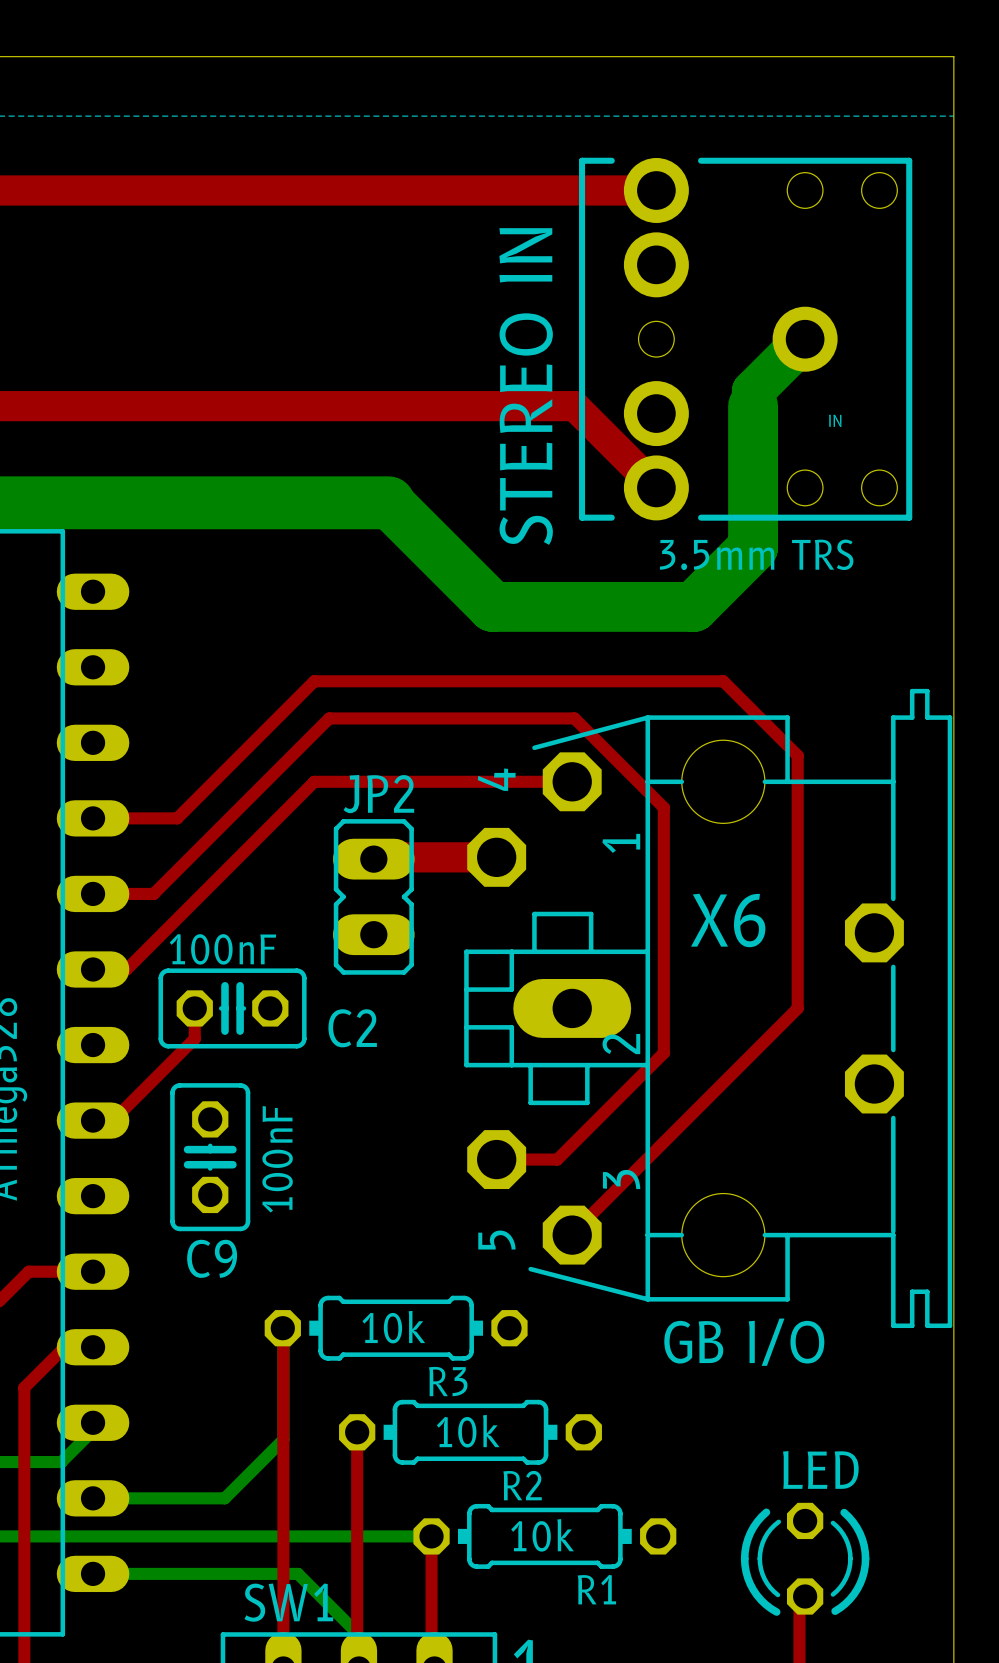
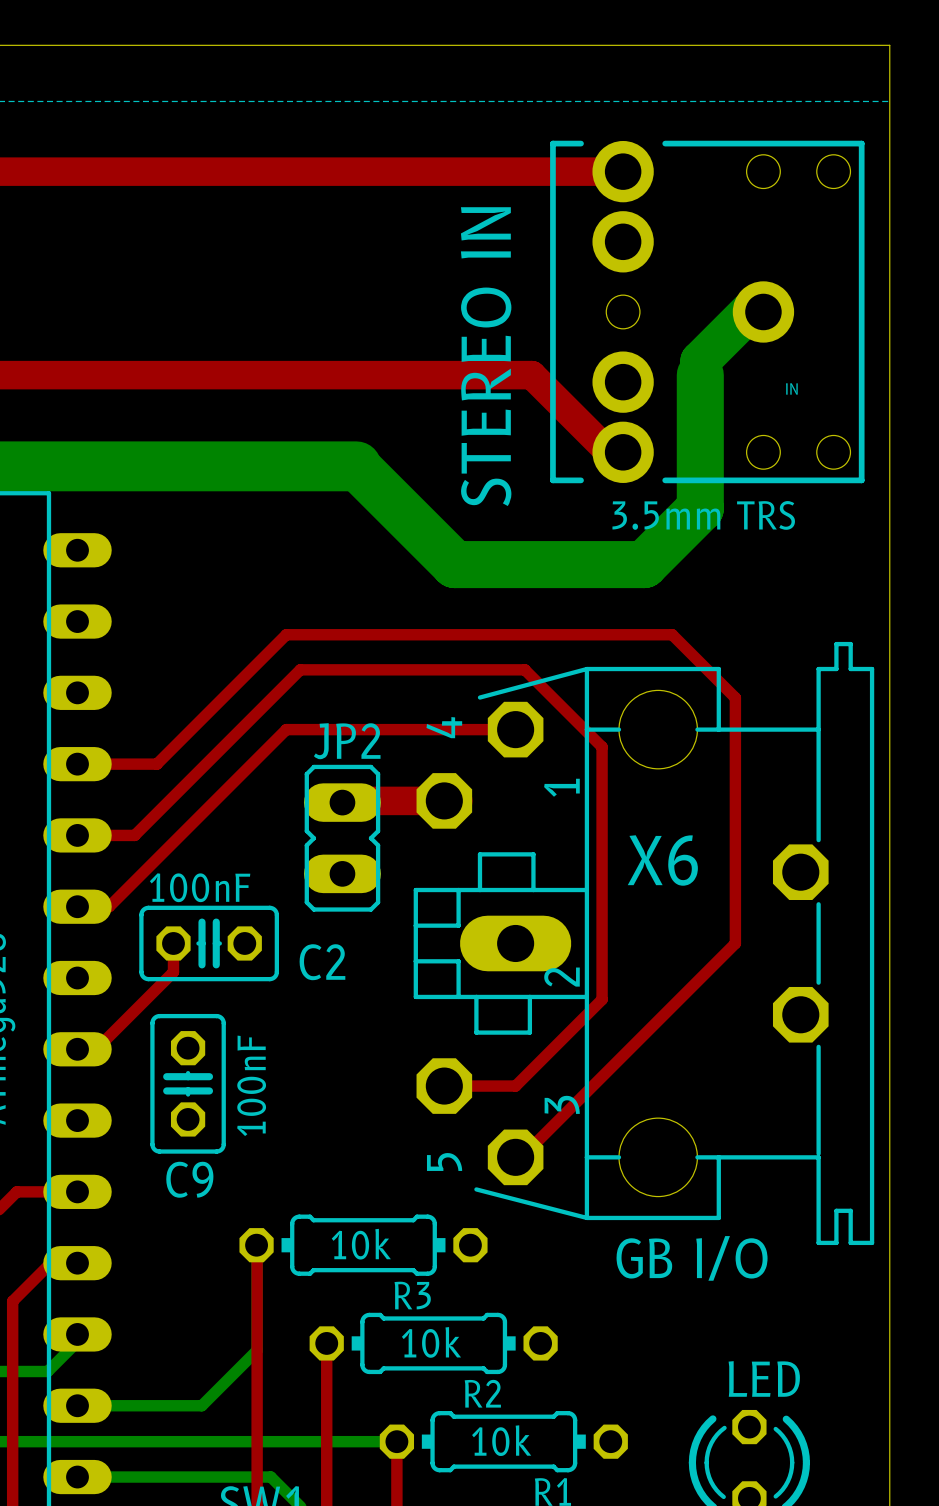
IN position: (745, 339) -> (707, 311)
top track: (567, 718) (574, 718) (663, 807) (663, 1053) (648, 1067) -> (524, 669) (602, 747) (602, 999)
top track: (790, 748) (797, 755) (797, 1008) (572, 1235) -> (735, 697) (735, 943) (521, 1157) (515, 1157)
X6 position: (708, 1008) -> (643, 943)

